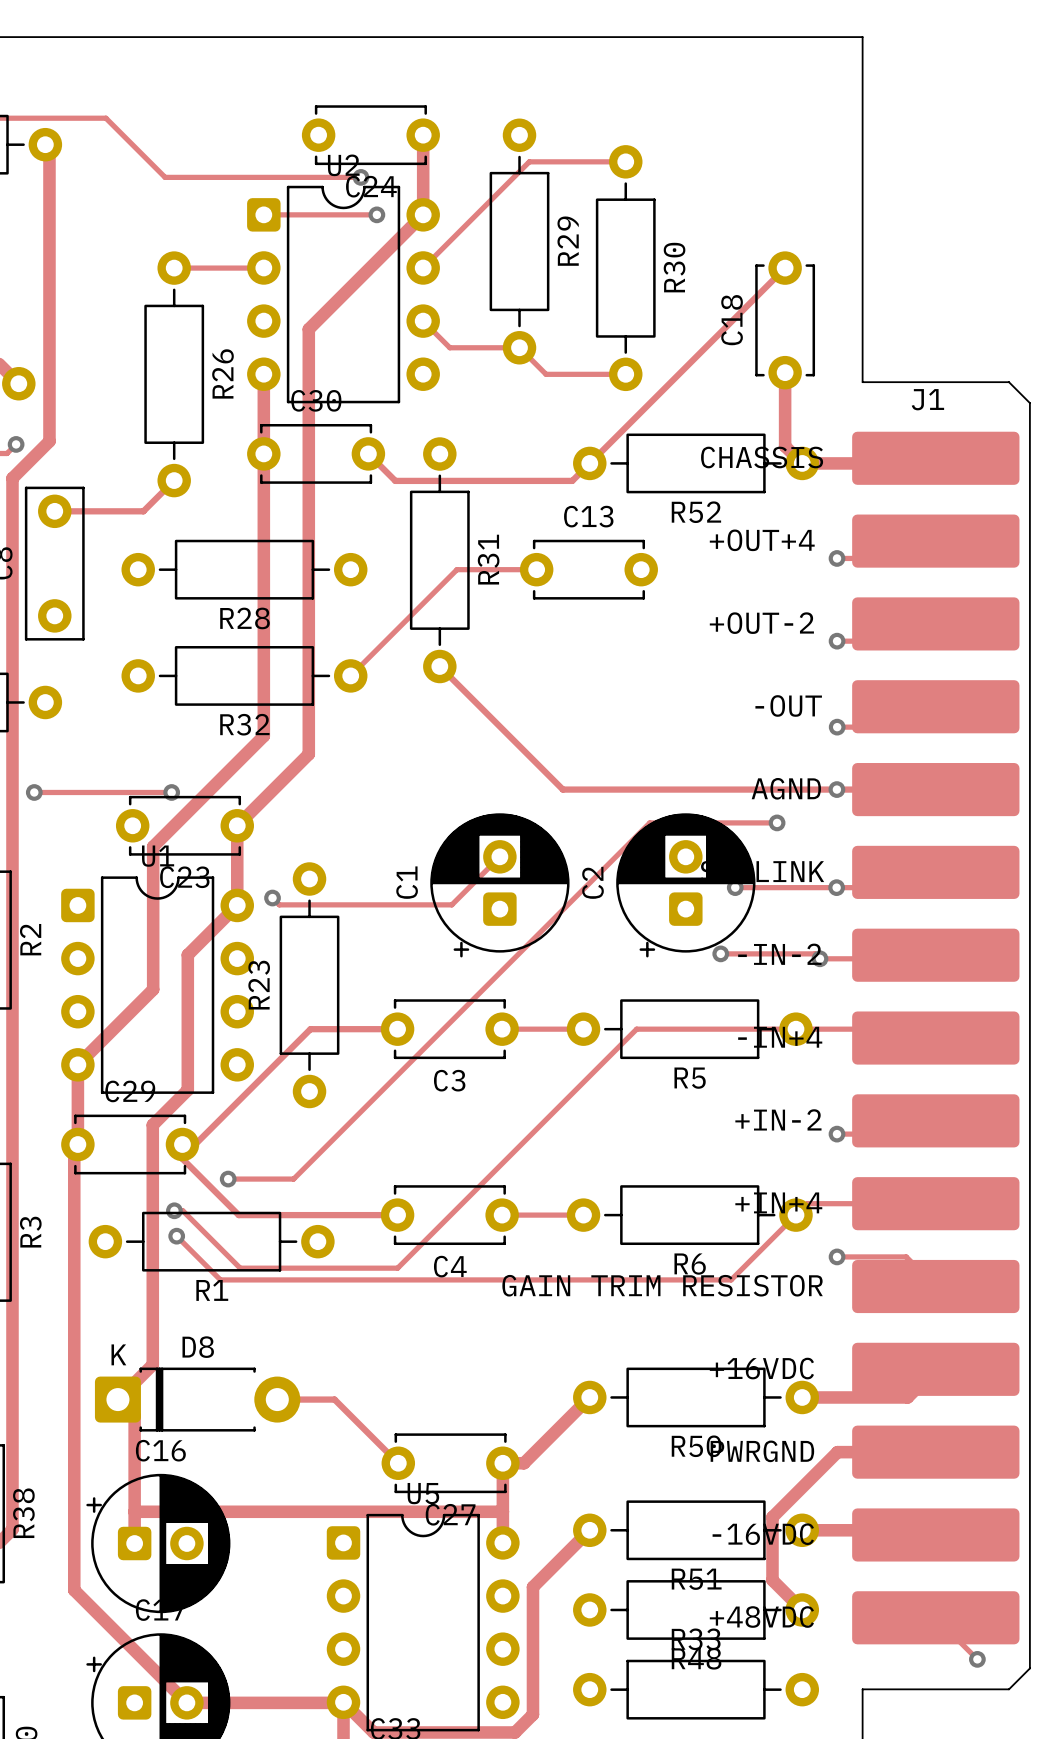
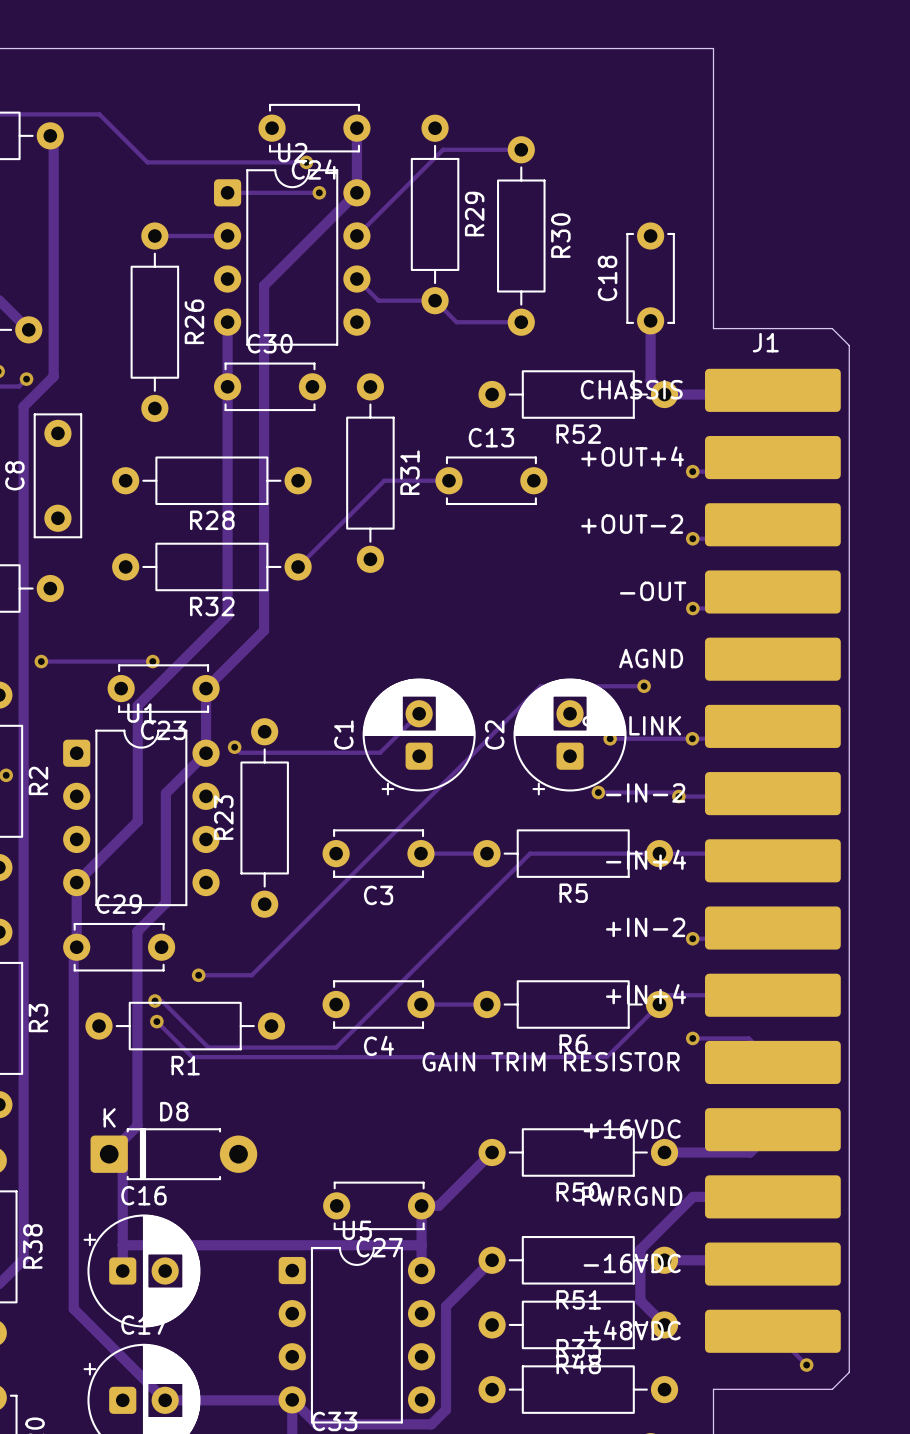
track: (785, 268) (572, 480) (395, 480) (368, 453) -> none
track: (174, 480) (143, 511) (54, 511) -> none
track: (439, 666) (562, 789) (935, 789) -> none
via: (836, 789) -> none
track: (397, 1029) (310, 1029) (195, 1144) (182, 1144) (182, 1158) (238, 1215) (397, 1215) -> none
track: (277, 1399) (334, 1399) (398, 1463) -> none

